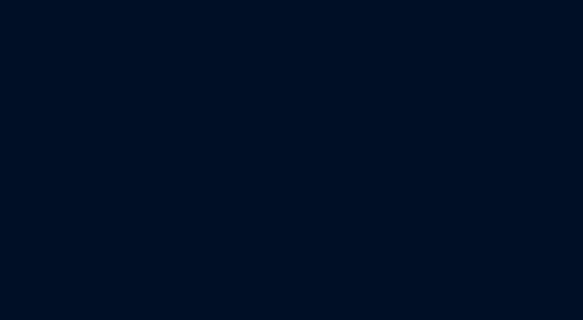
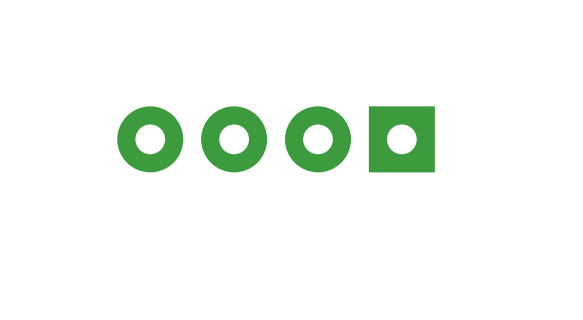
part: none -> (276, 139)

